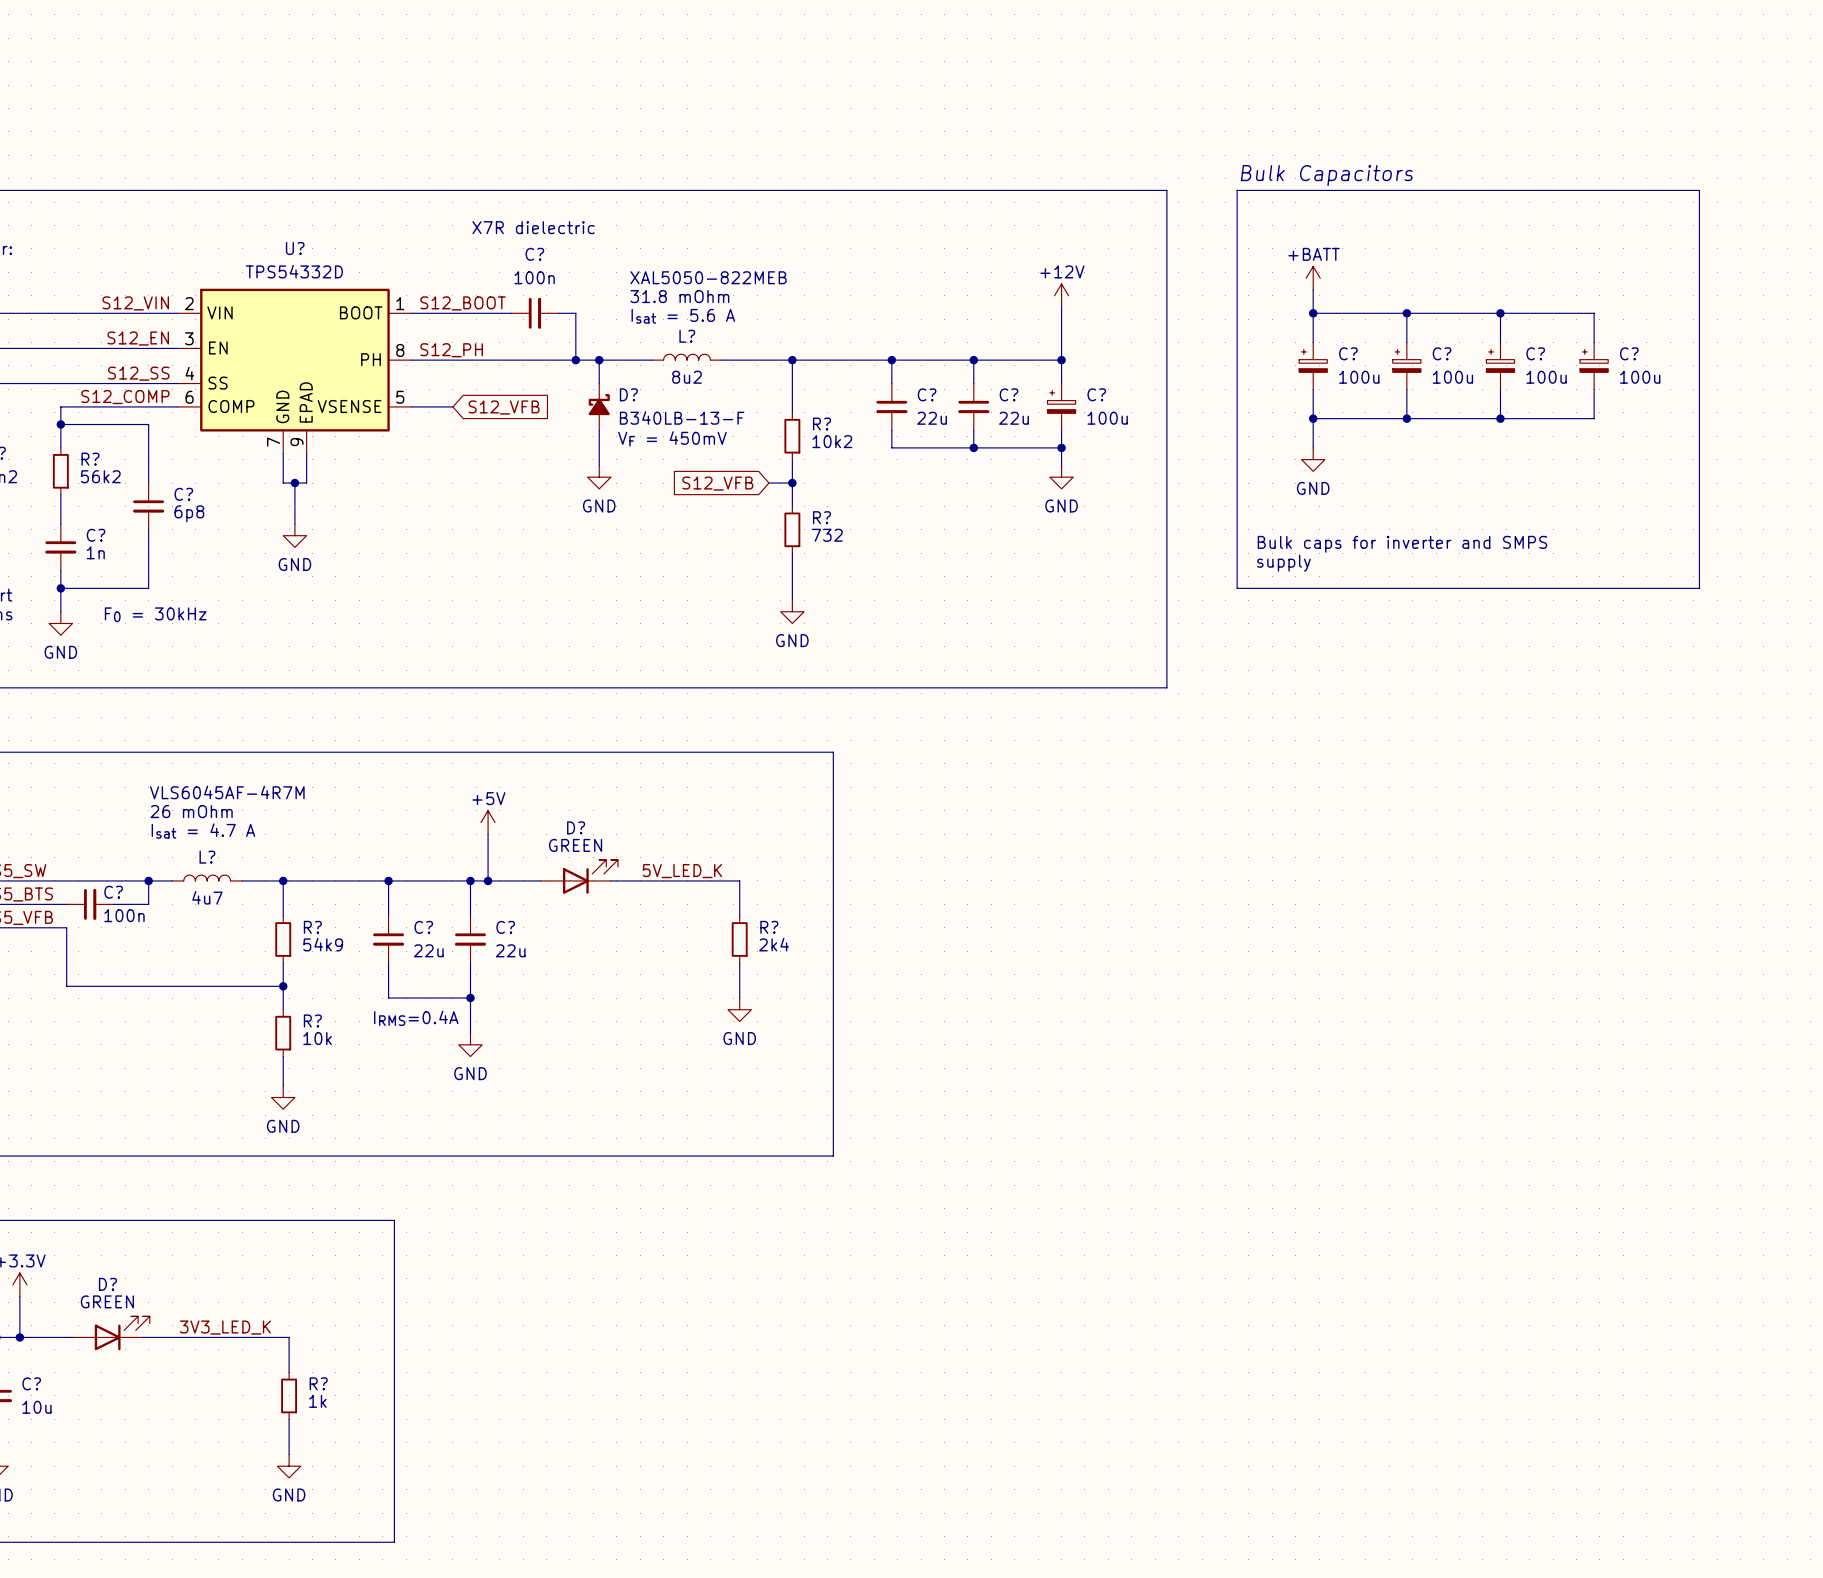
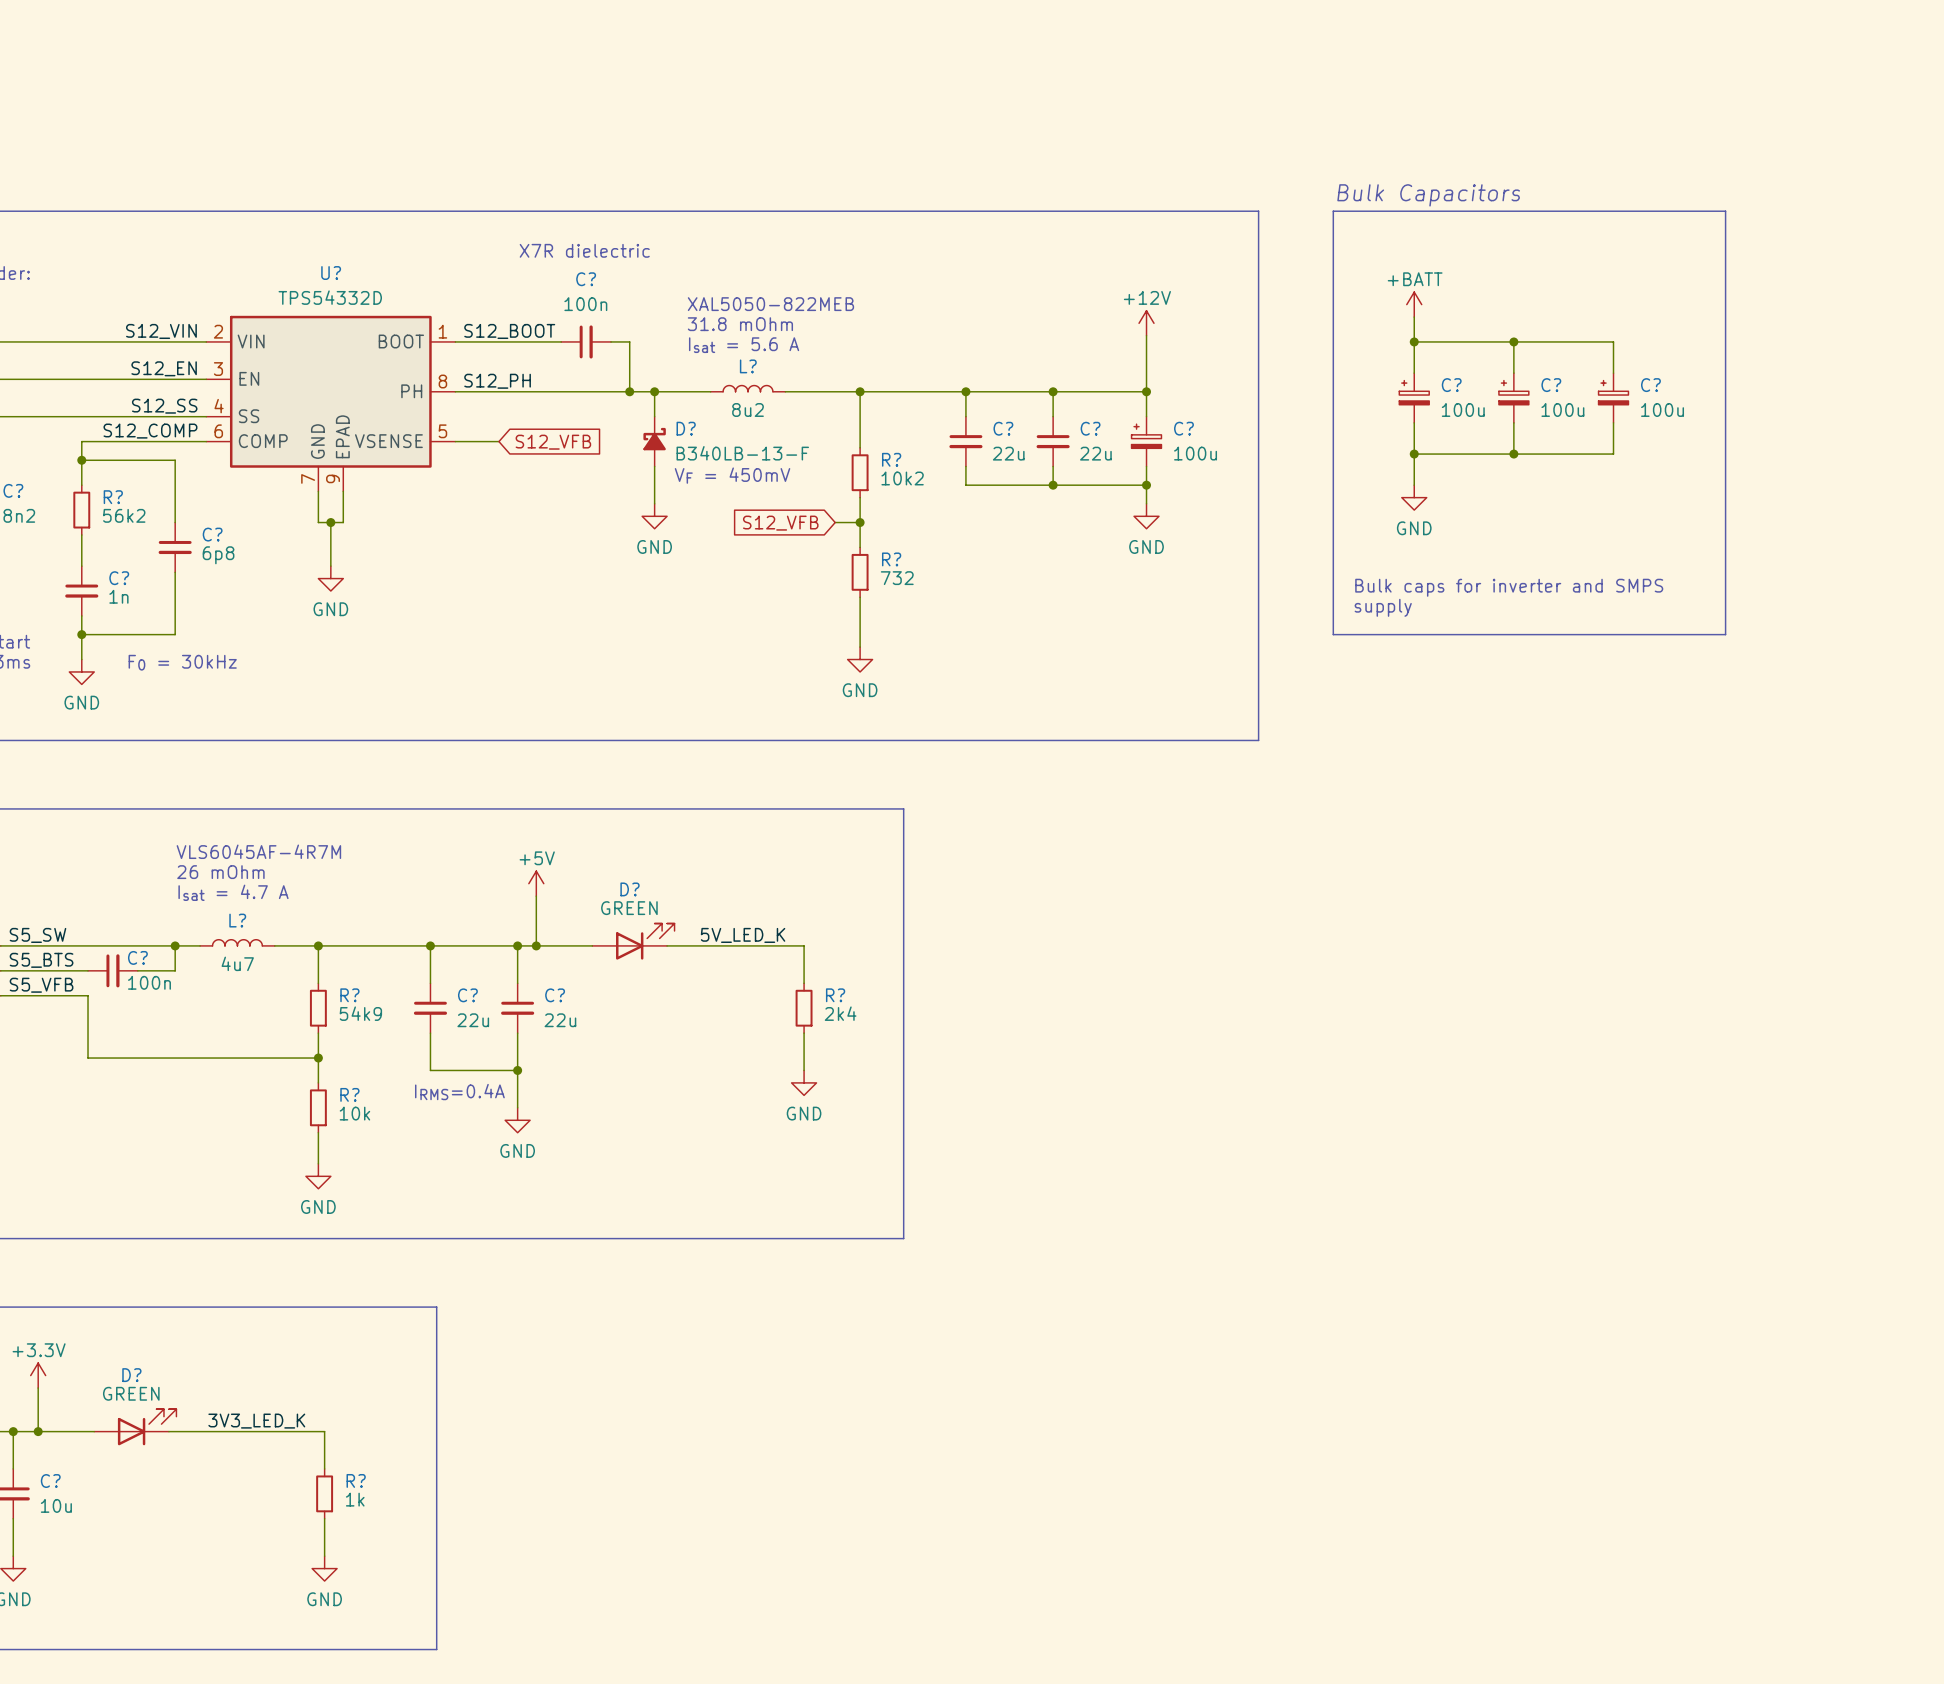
line: (1605, 190) (1699, 190) (1699, 588) (1605, 588) -> (1725, 211) (1725, 634)
wire: (1500, 313) (1594, 313) (1594, 342) -> none
junction: (1500, 313) -> none
C?: 100u (1594, 365) -> none
wire: (1594, 389) (1594, 418) (1500, 418) -> none
junction: (1500, 418) -> none

